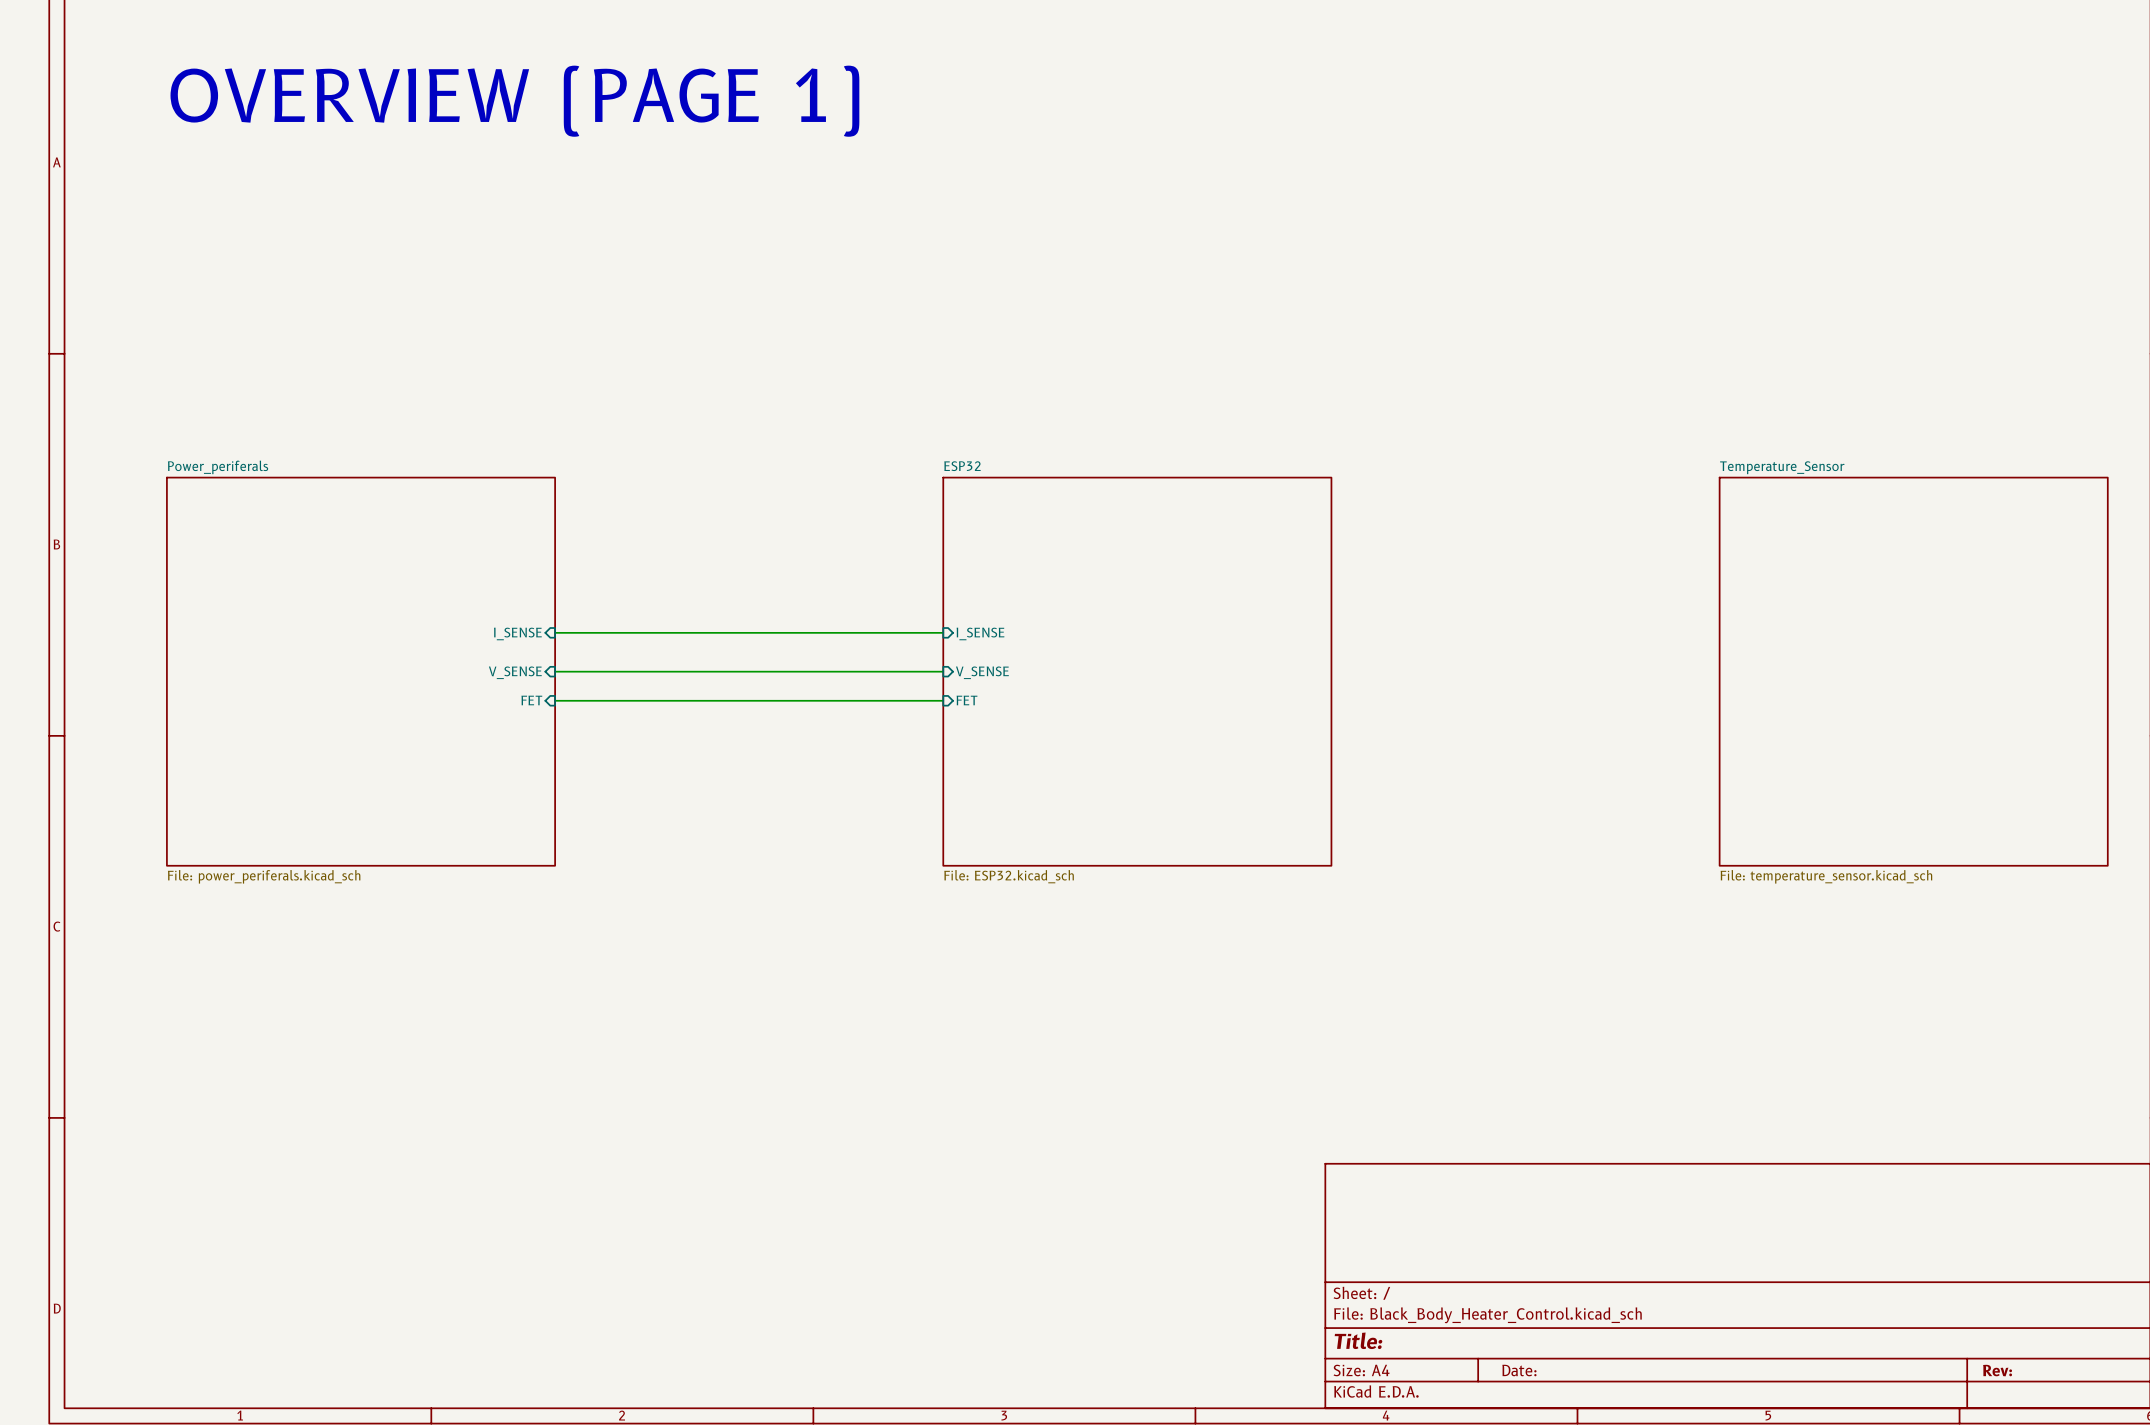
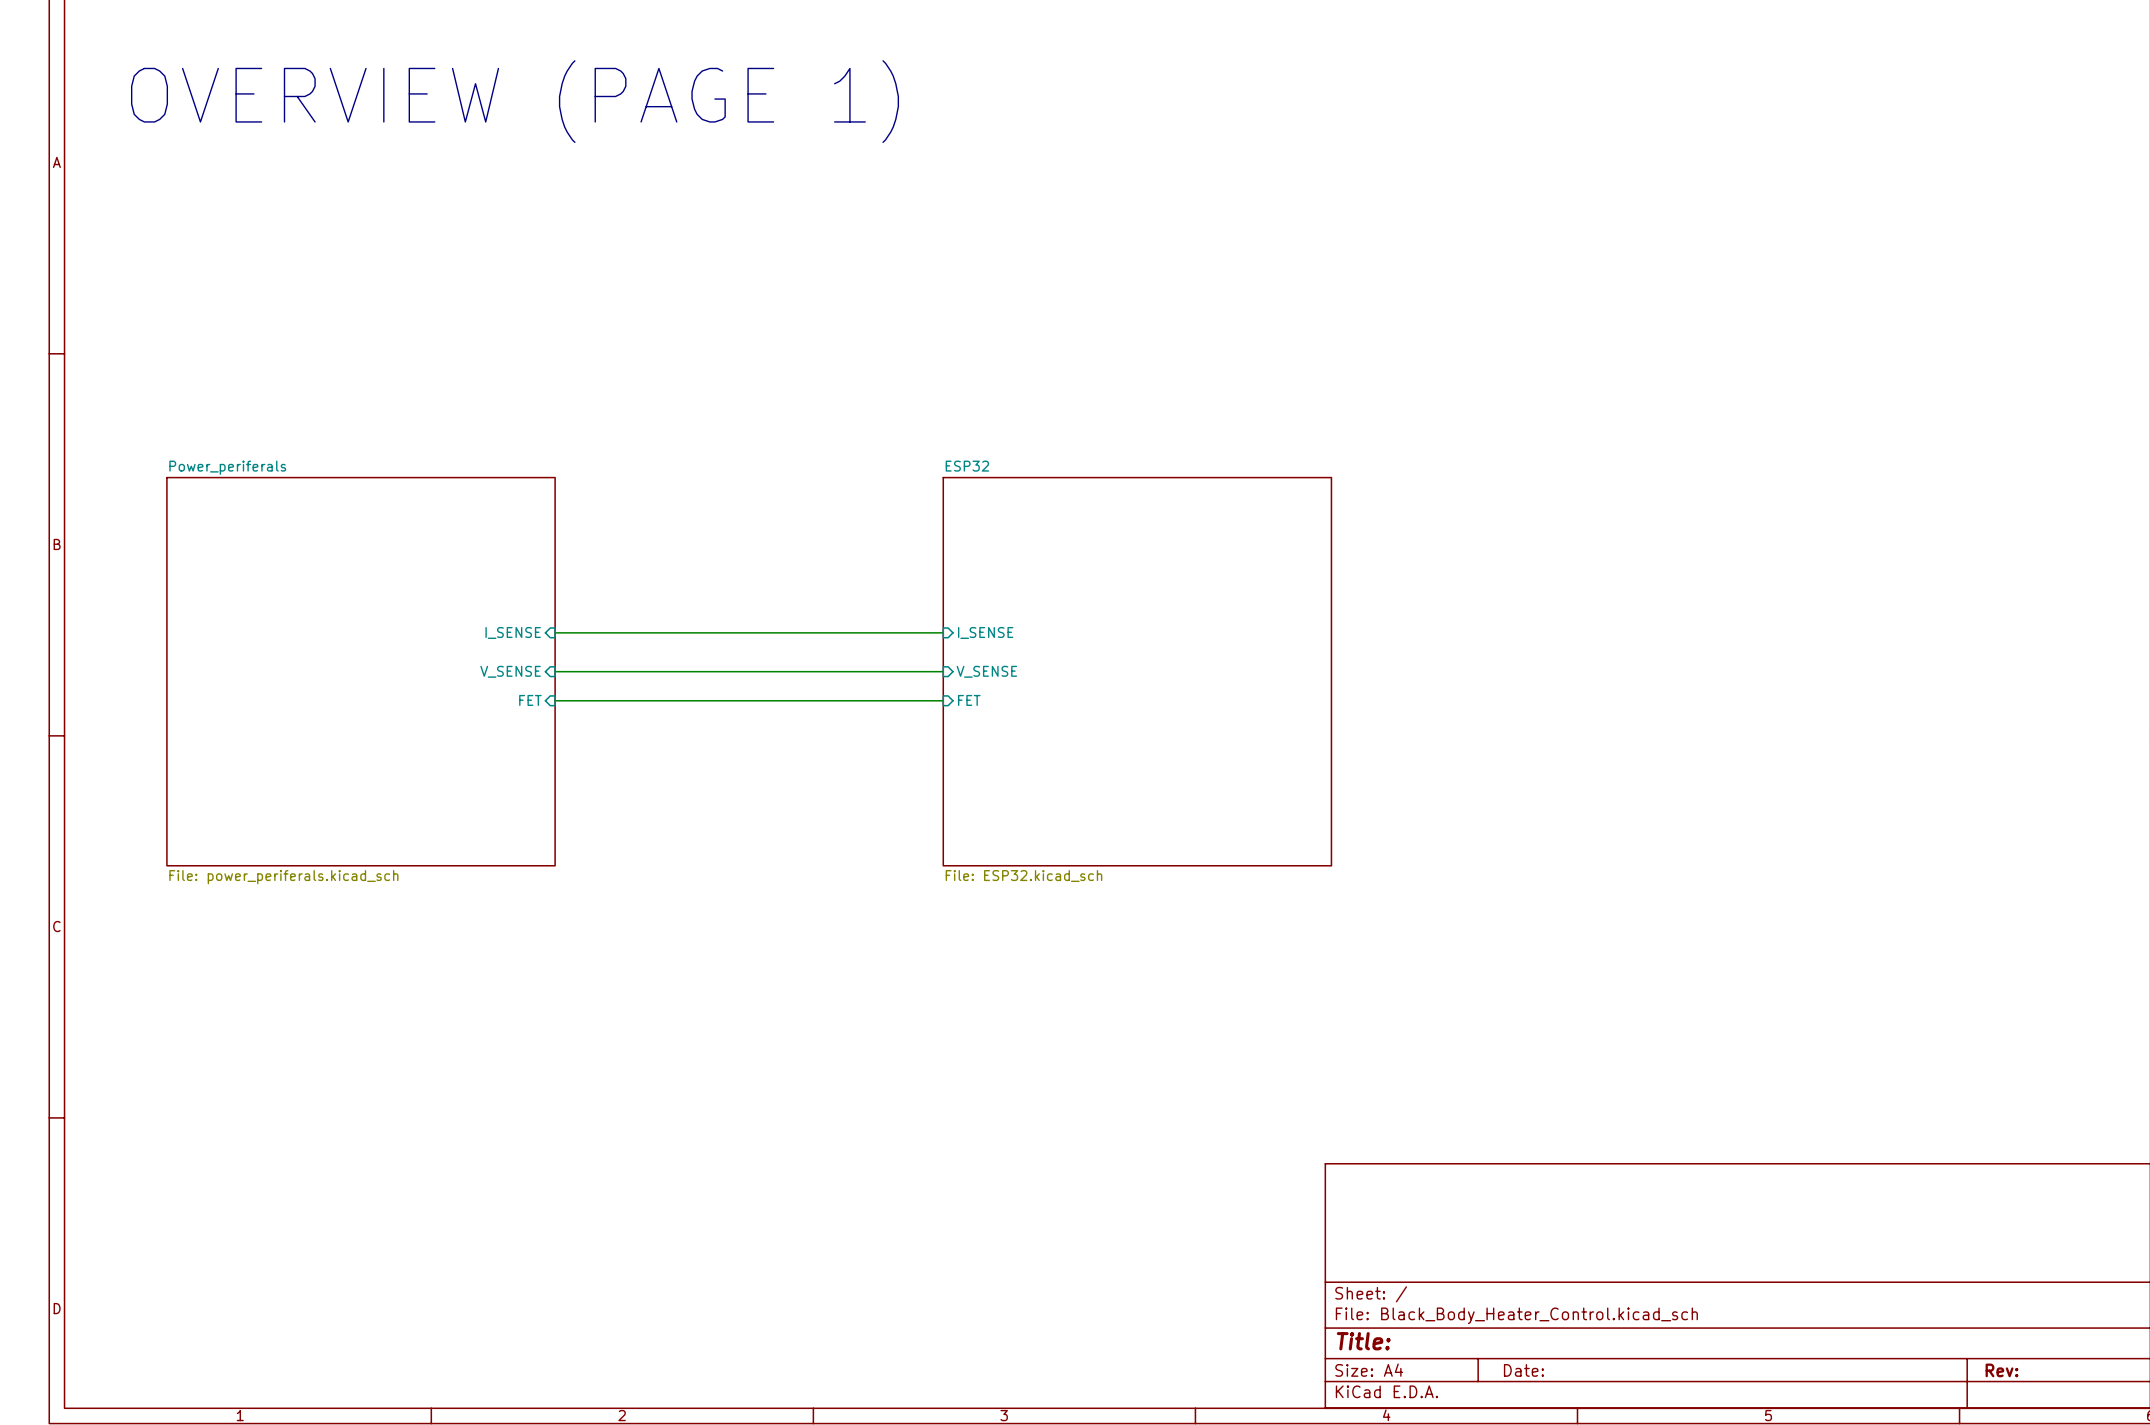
sheet Temperature_Sensor: File: temperature_sensor.kicad_sch (1913, 671) -> none

